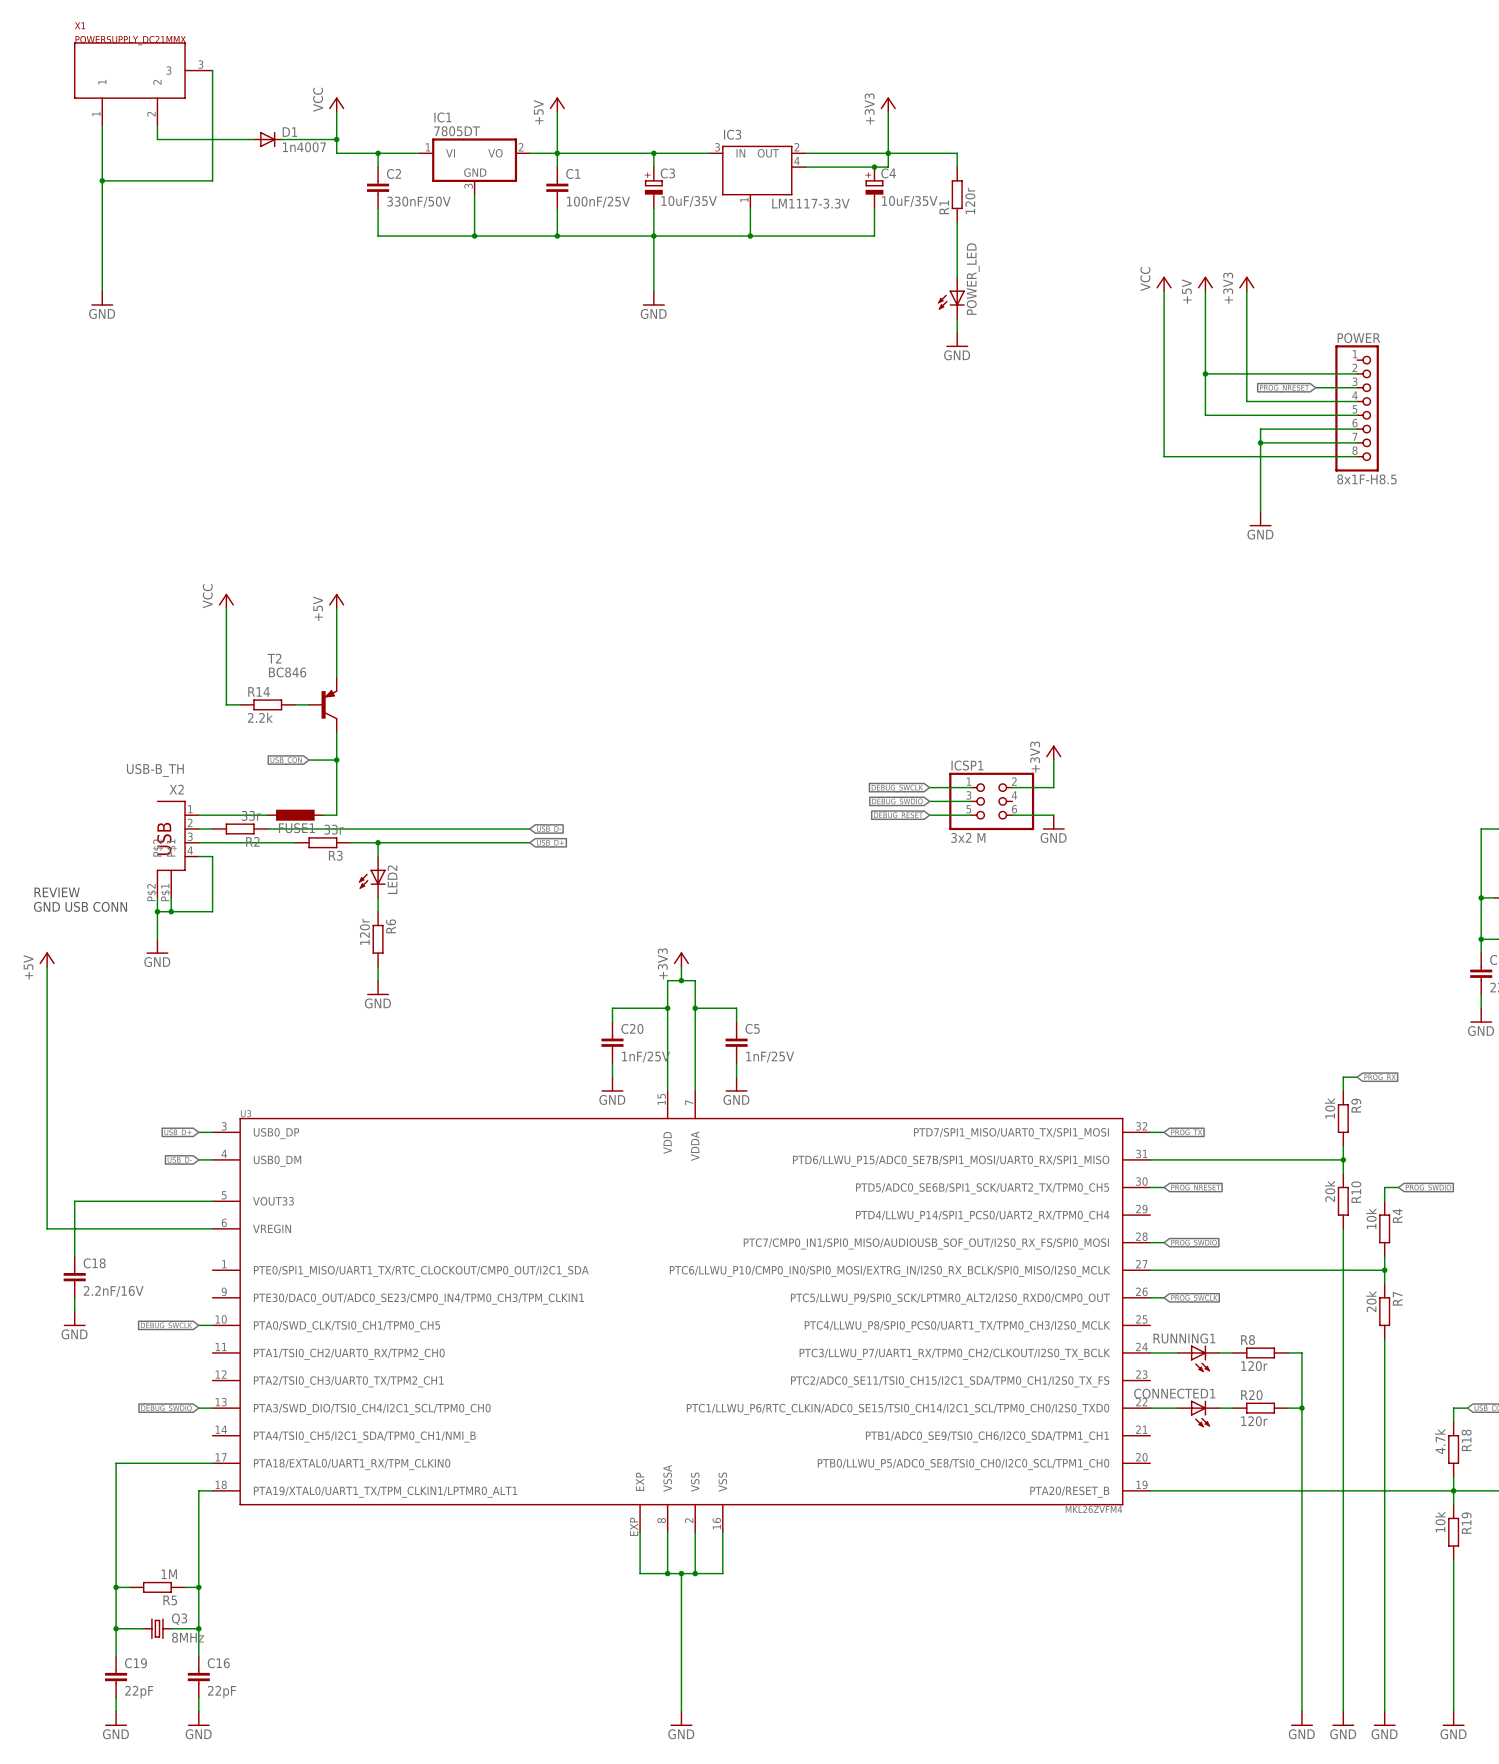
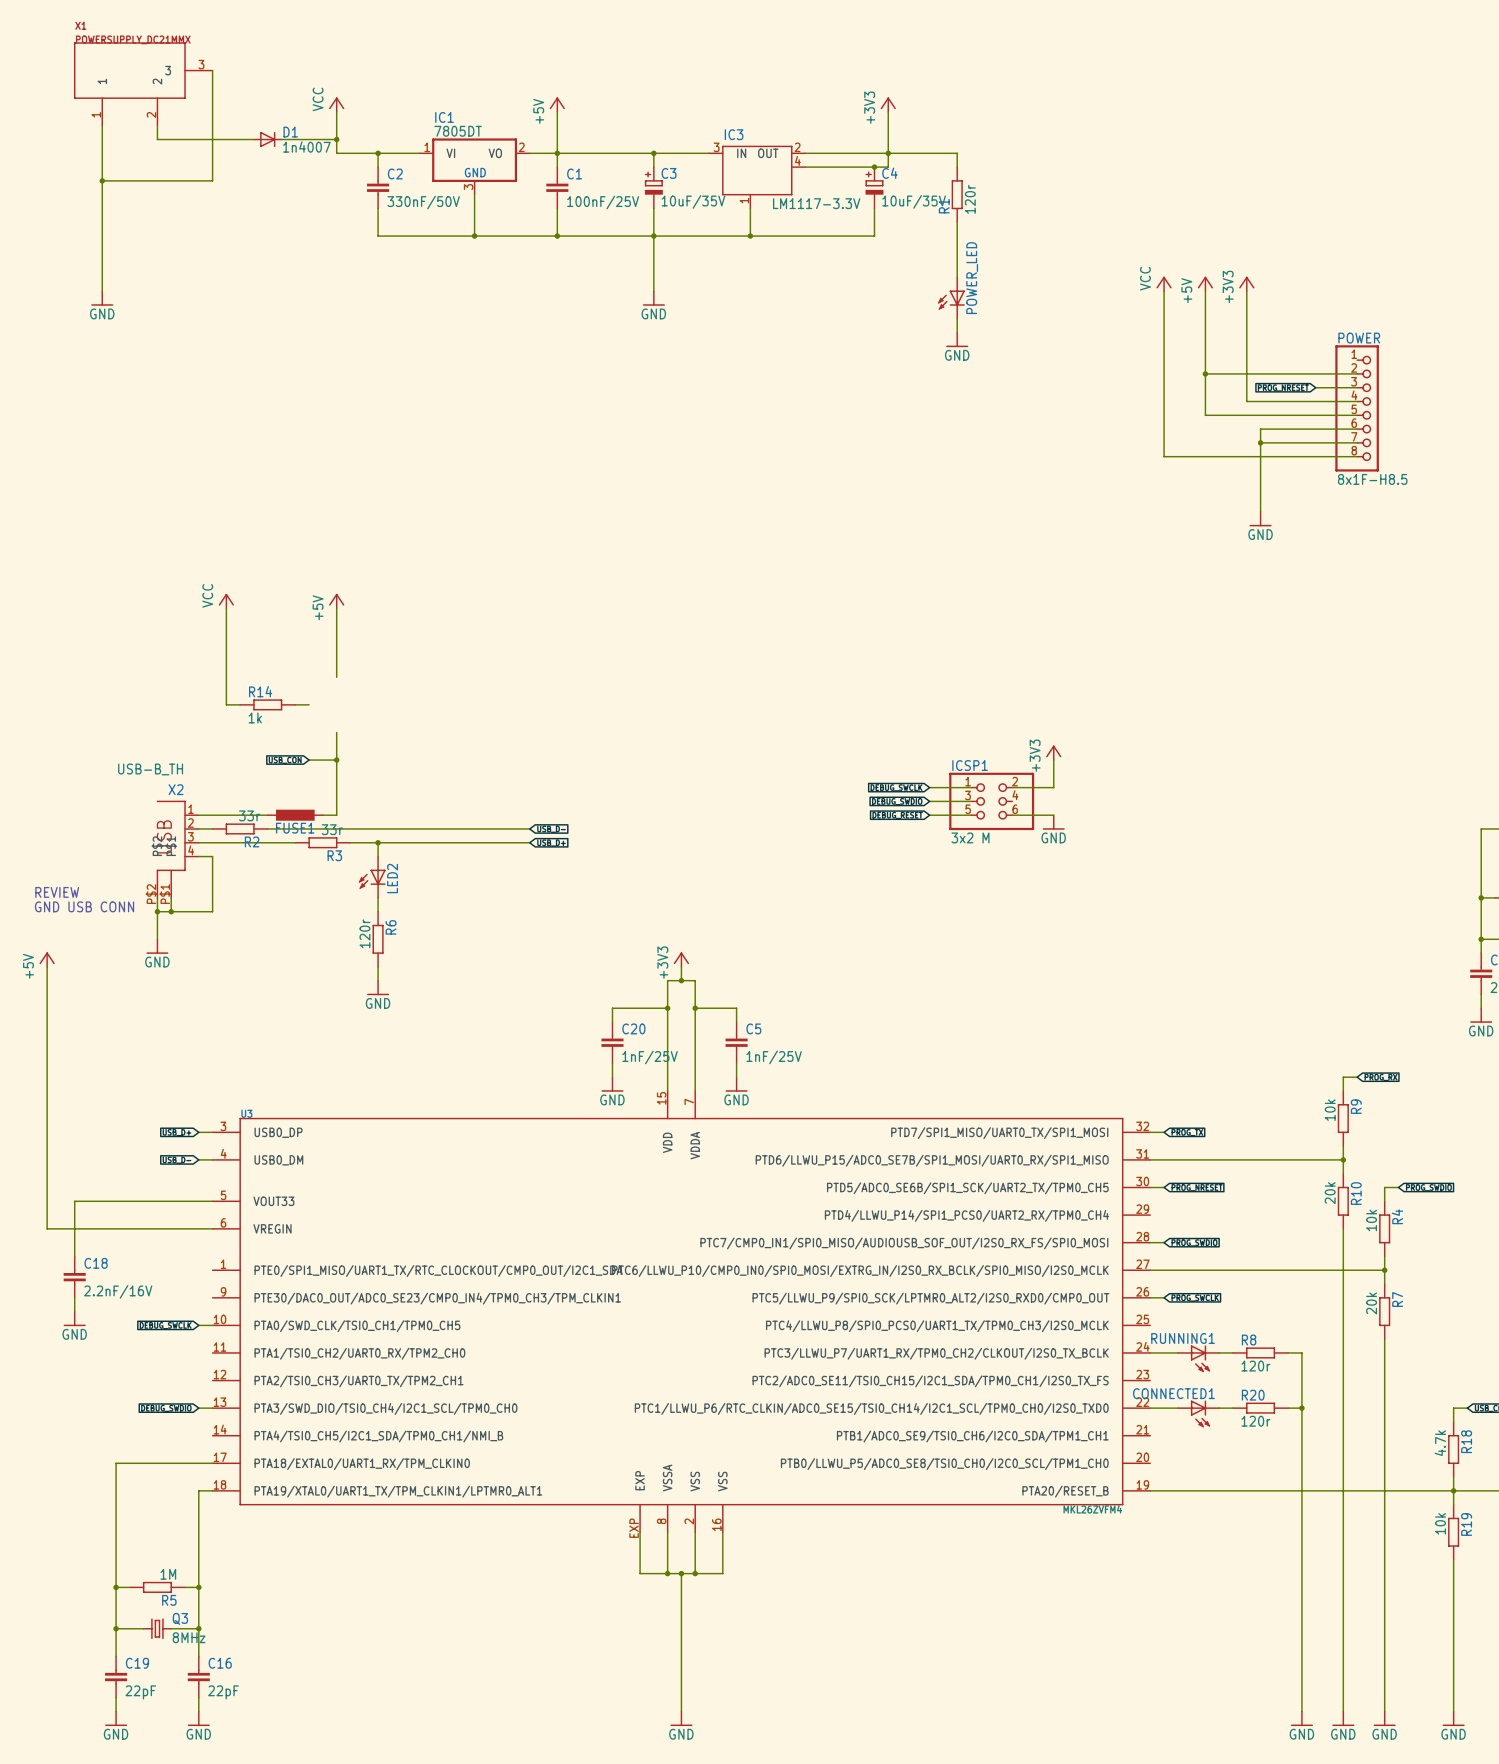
T2: BC846 (323, 704) -> none
R14 value: 2.2k (260, 717) -> 1k (255, 717)

